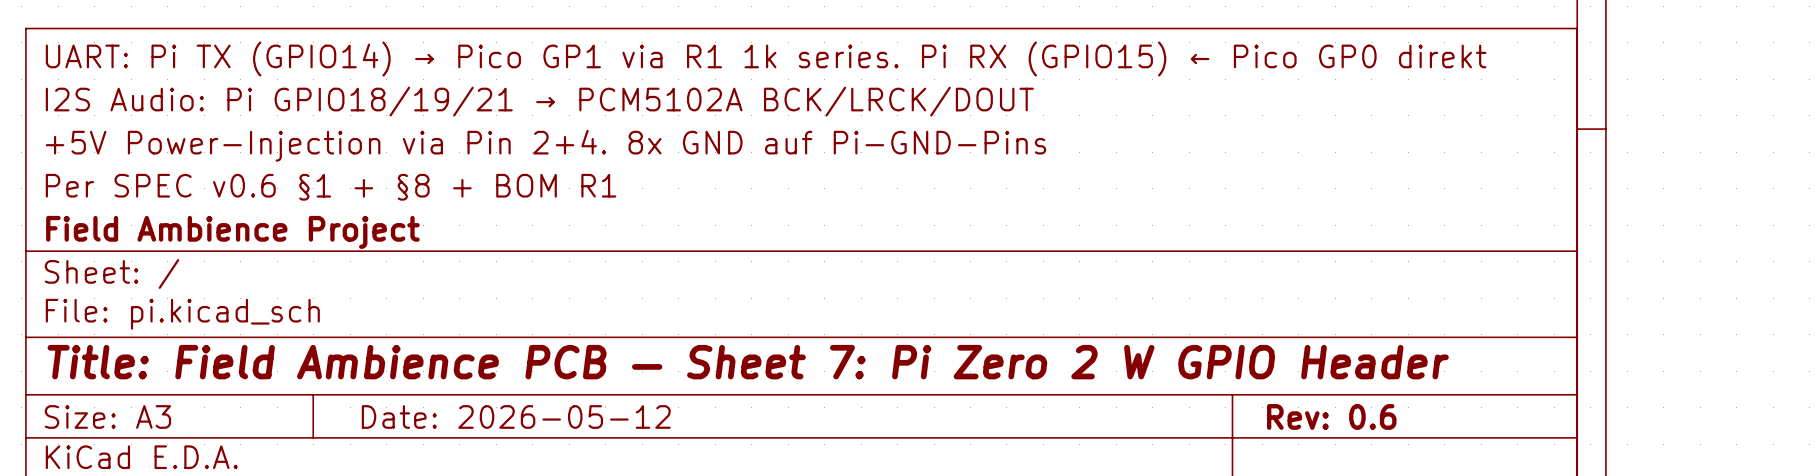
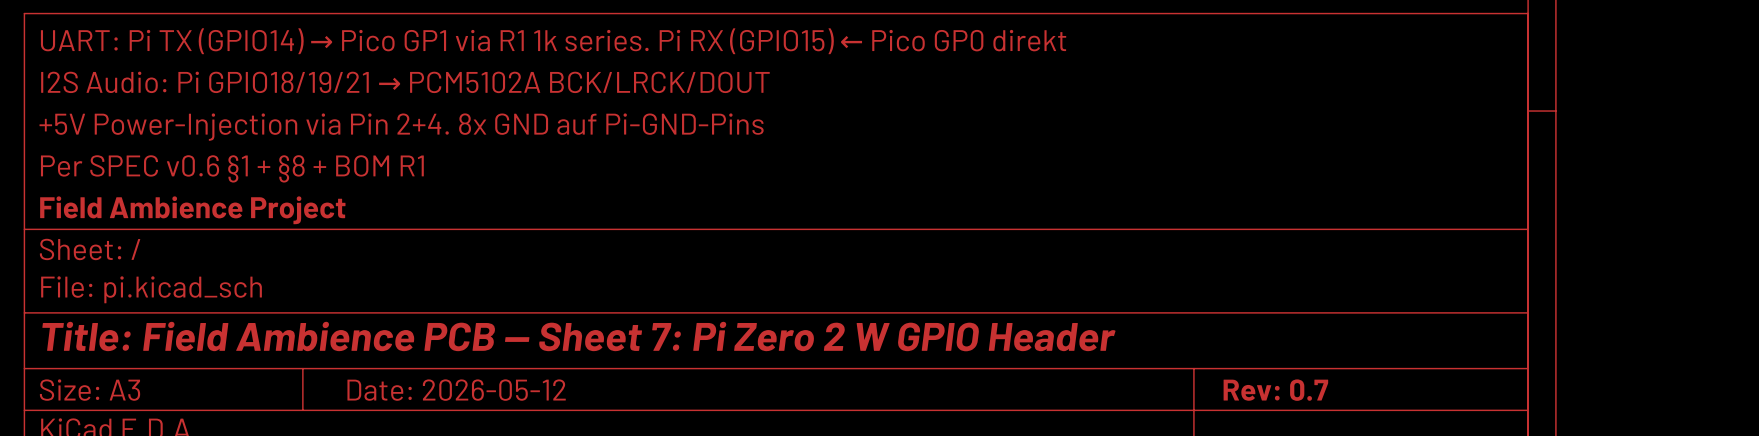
title block: Rev: 0.6 (1331, 416) -> Rev: 0.7 (1275, 390)

